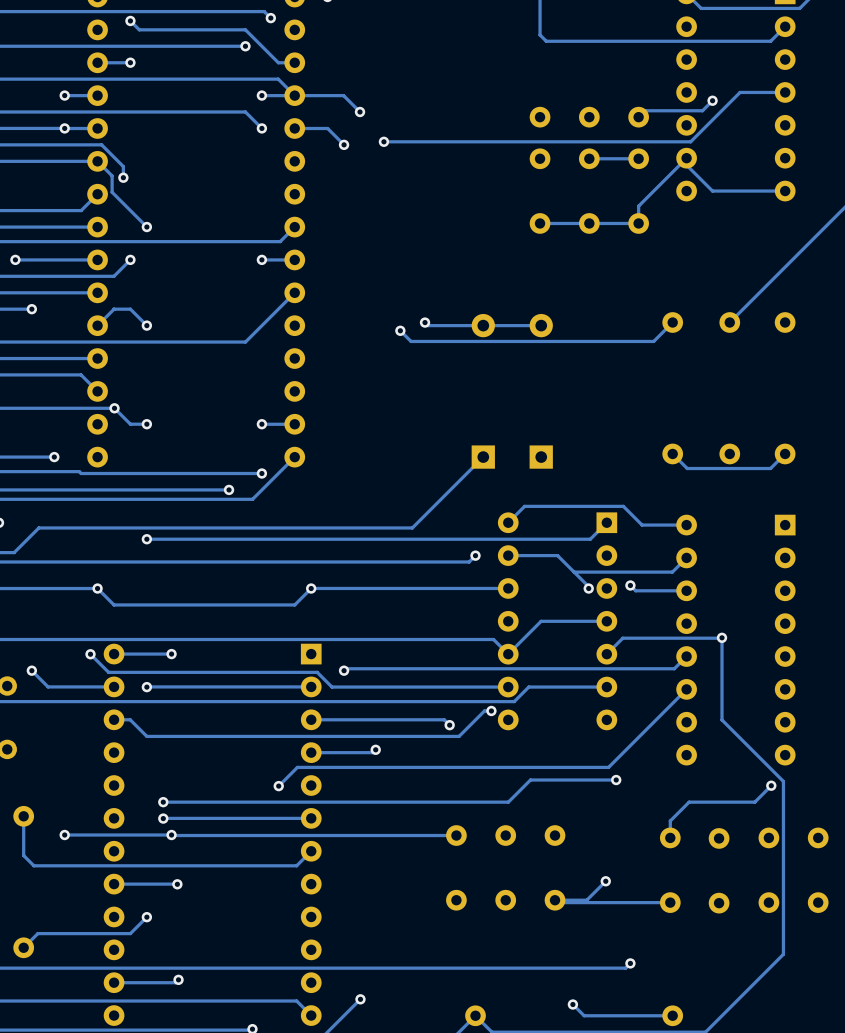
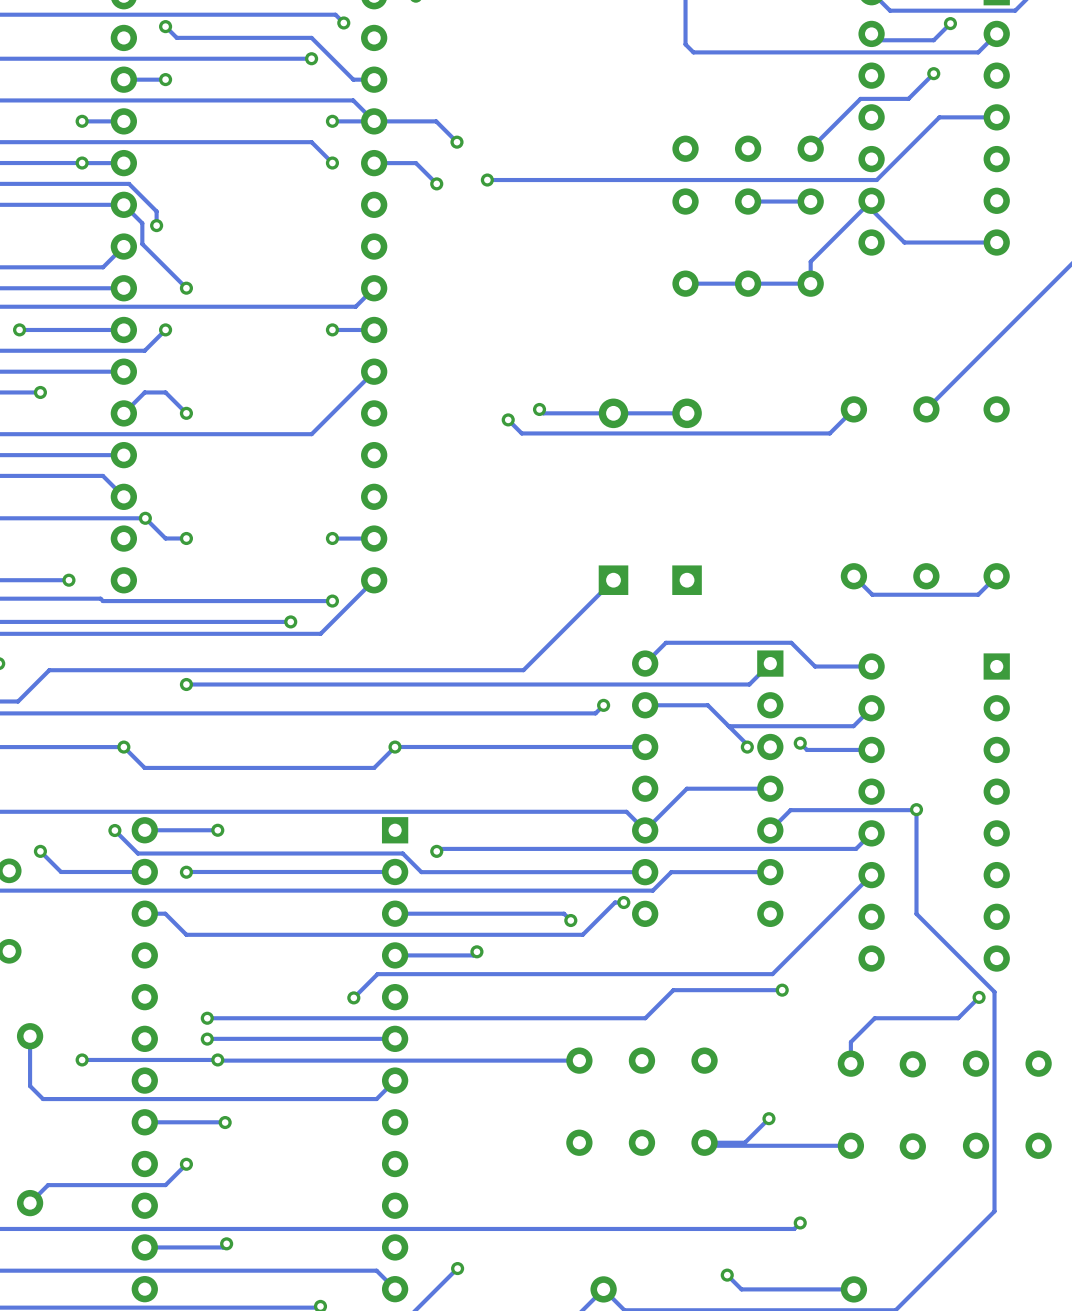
track: none -> (950, 23) (933, 40) (877, 40) (871, 33)
via: none -> (950, 23)
via: none -> (933, 73)
track: (712, 100) (702, 110) (645, 110) -> (933, 73) (908, 98) (860, 98) (818, 140)
via: (712, 100) -> none

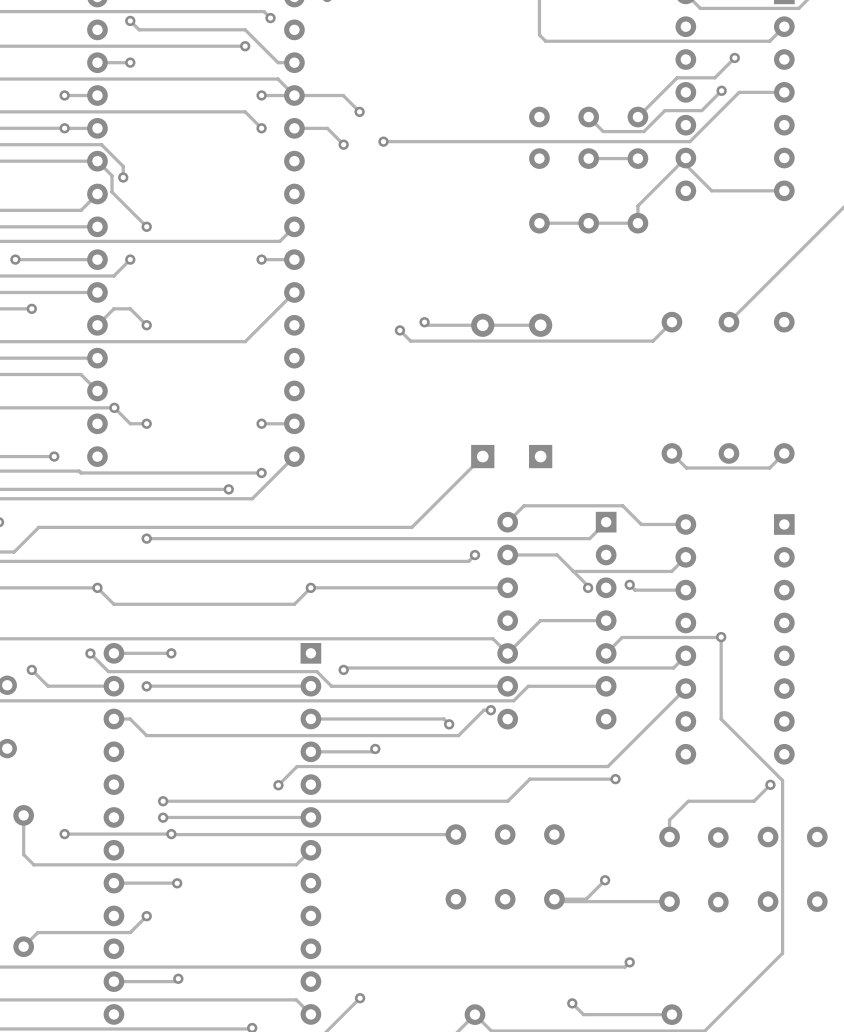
track: (950, 23) (933, 40) (877, 40) (871, 33) -> none
via position: (950, 23) -> (721, 90)
track: none -> (721, 90) (701, 110) (664, 110) (643, 131) (603, 131) (588, 117)

